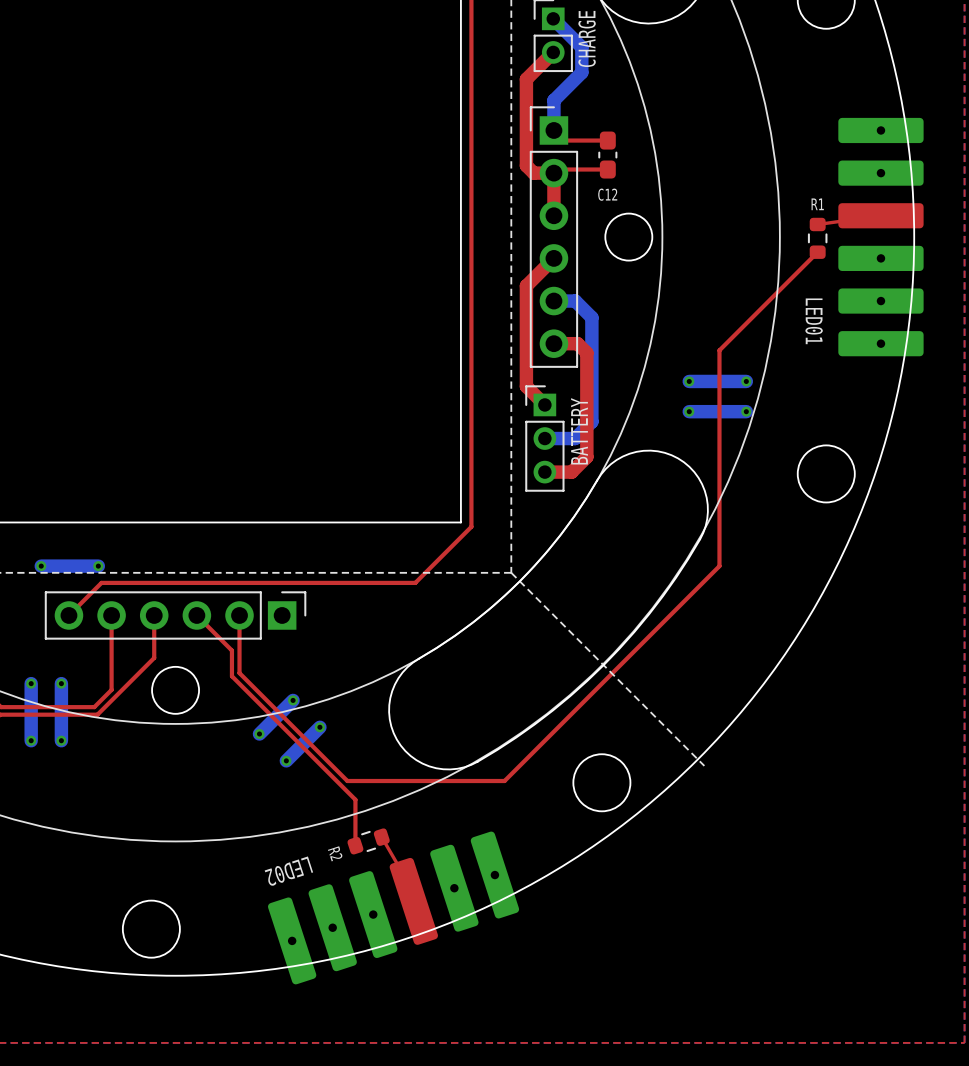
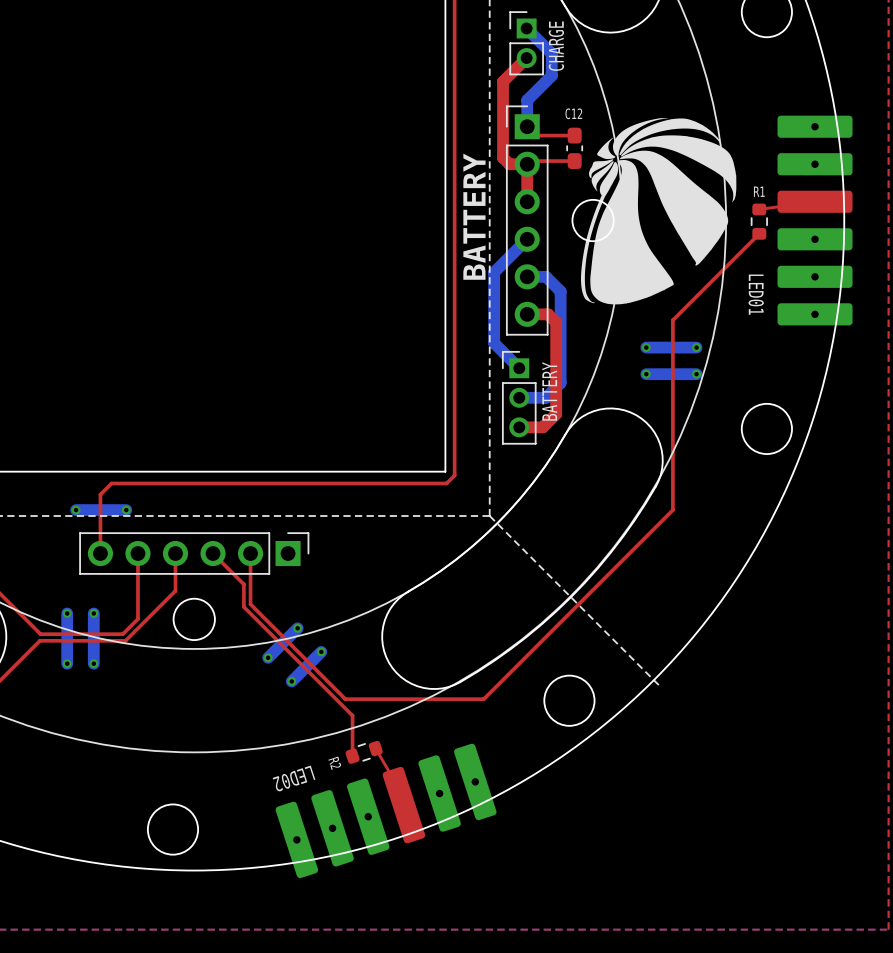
drawing: none -> [580, 118, 737, 305]
C12 name position: C12 (607, 194) -> C12 (573, 113)
text: none -> BATTERY (474, 216)
top track: (553, 258) (526, 285) (526, 386) (544, 404) -> none
bottom track: none -> (527, 239) (494, 272) (494, 343) (519, 368)
top track: (462, 535) (415, 582) (101, 582) (68, 615) -> (446, 483) (111, 483) (100, 494) (100, 553)

